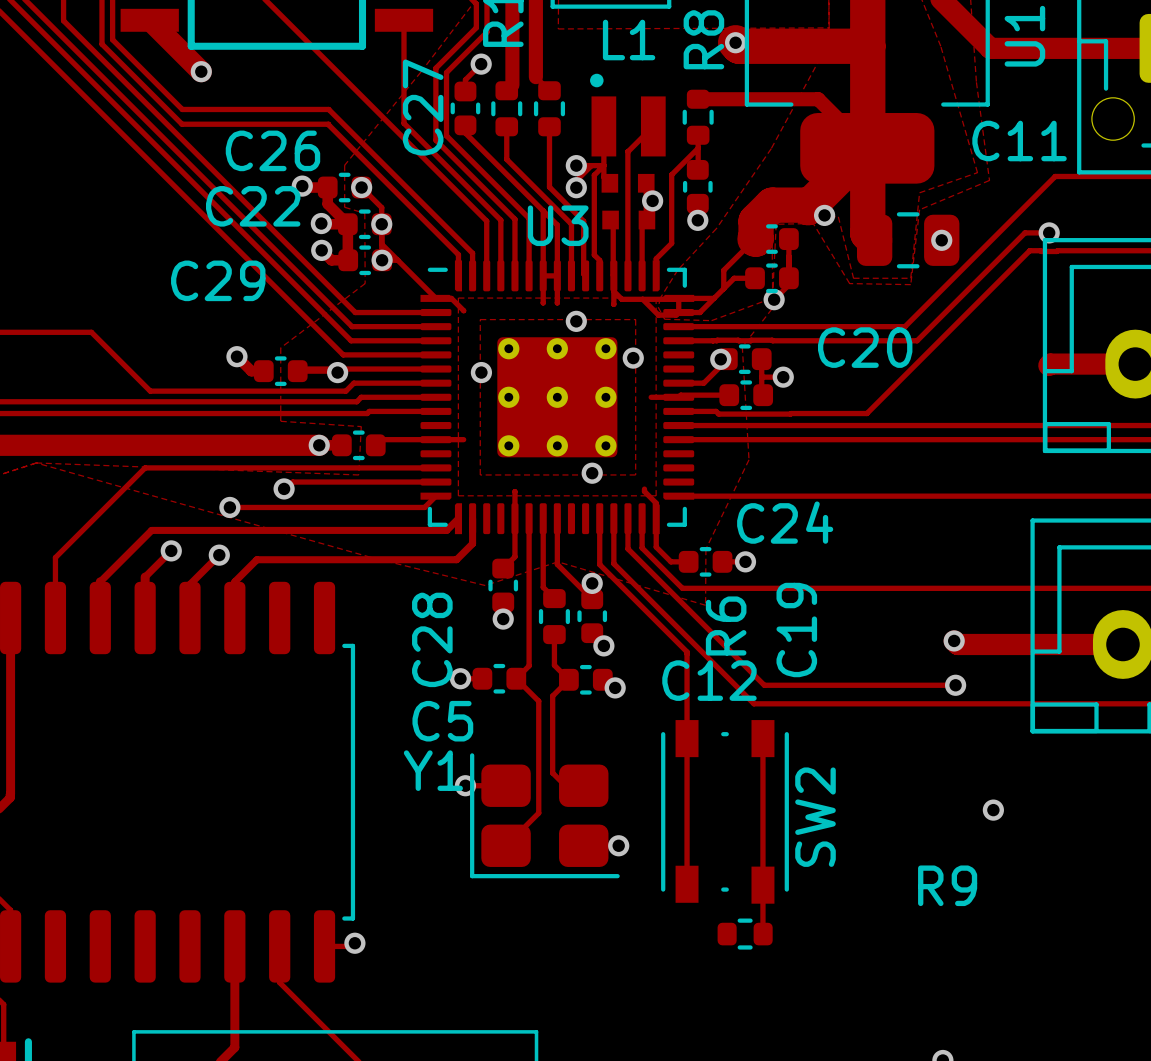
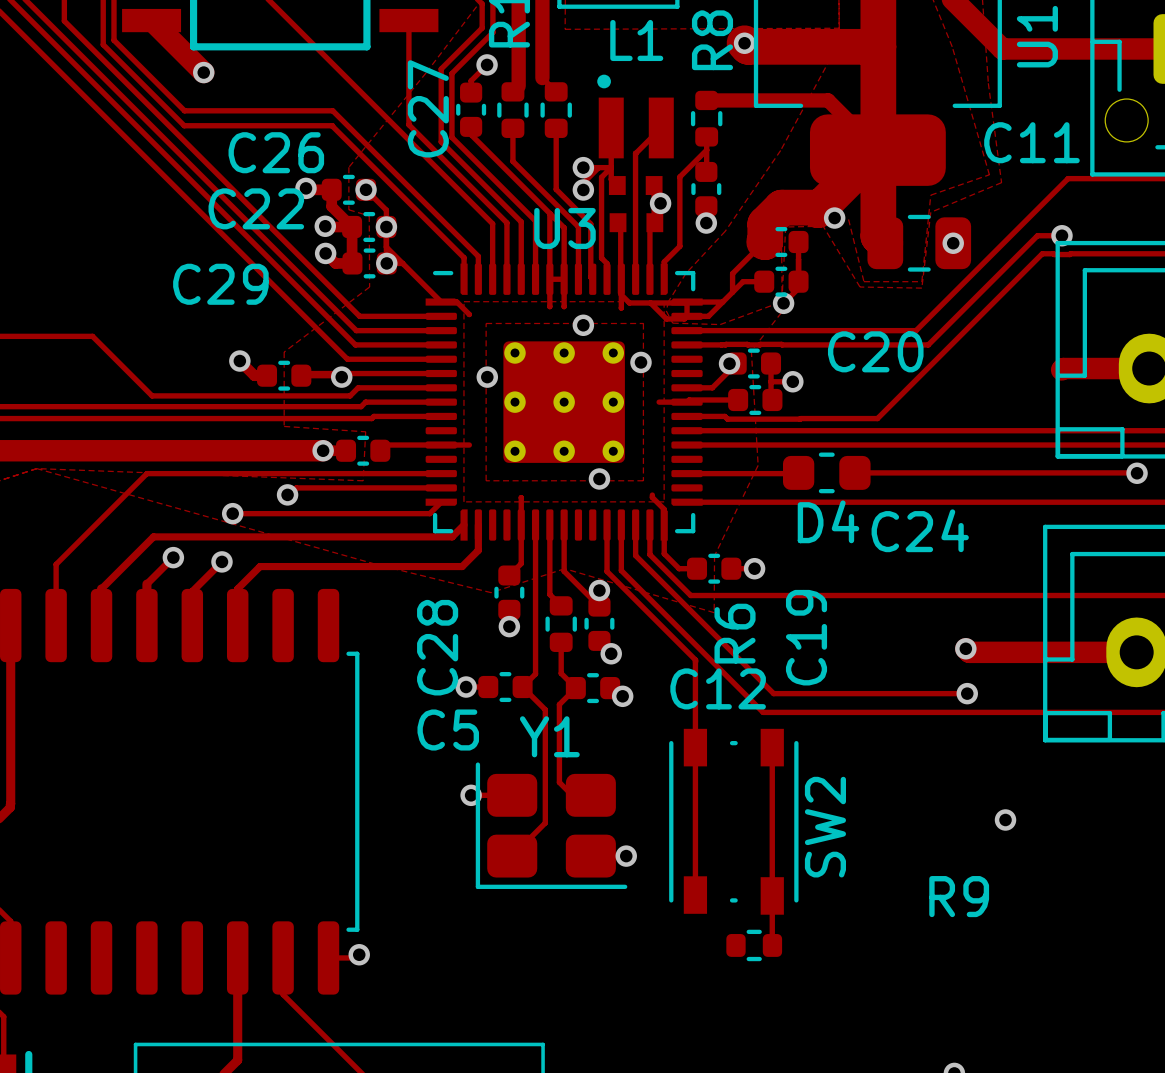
track: none -> (798, 472) (687, 473)
D4: none -> (826, 472)
track: none -> (854, 472) (1136, 472)
via: none -> (1137, 473)
C24 name position: C24 (785, 522) -> C24 (920, 530)
Y1 name position: Y1 (433, 770) -> Y1 (549, 736)

